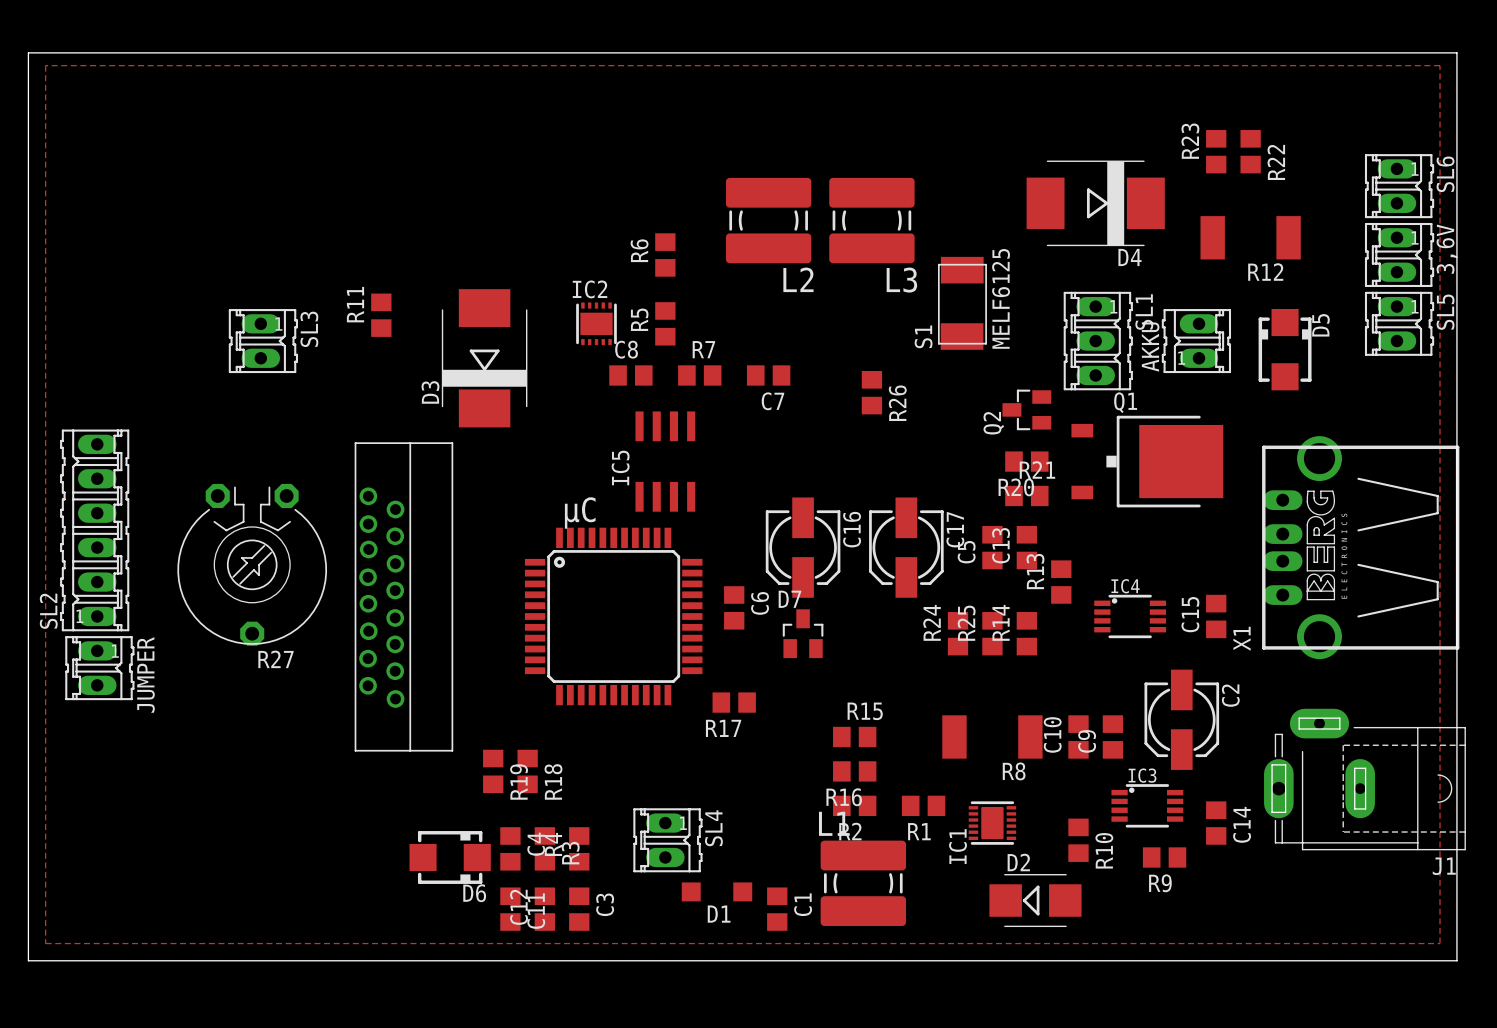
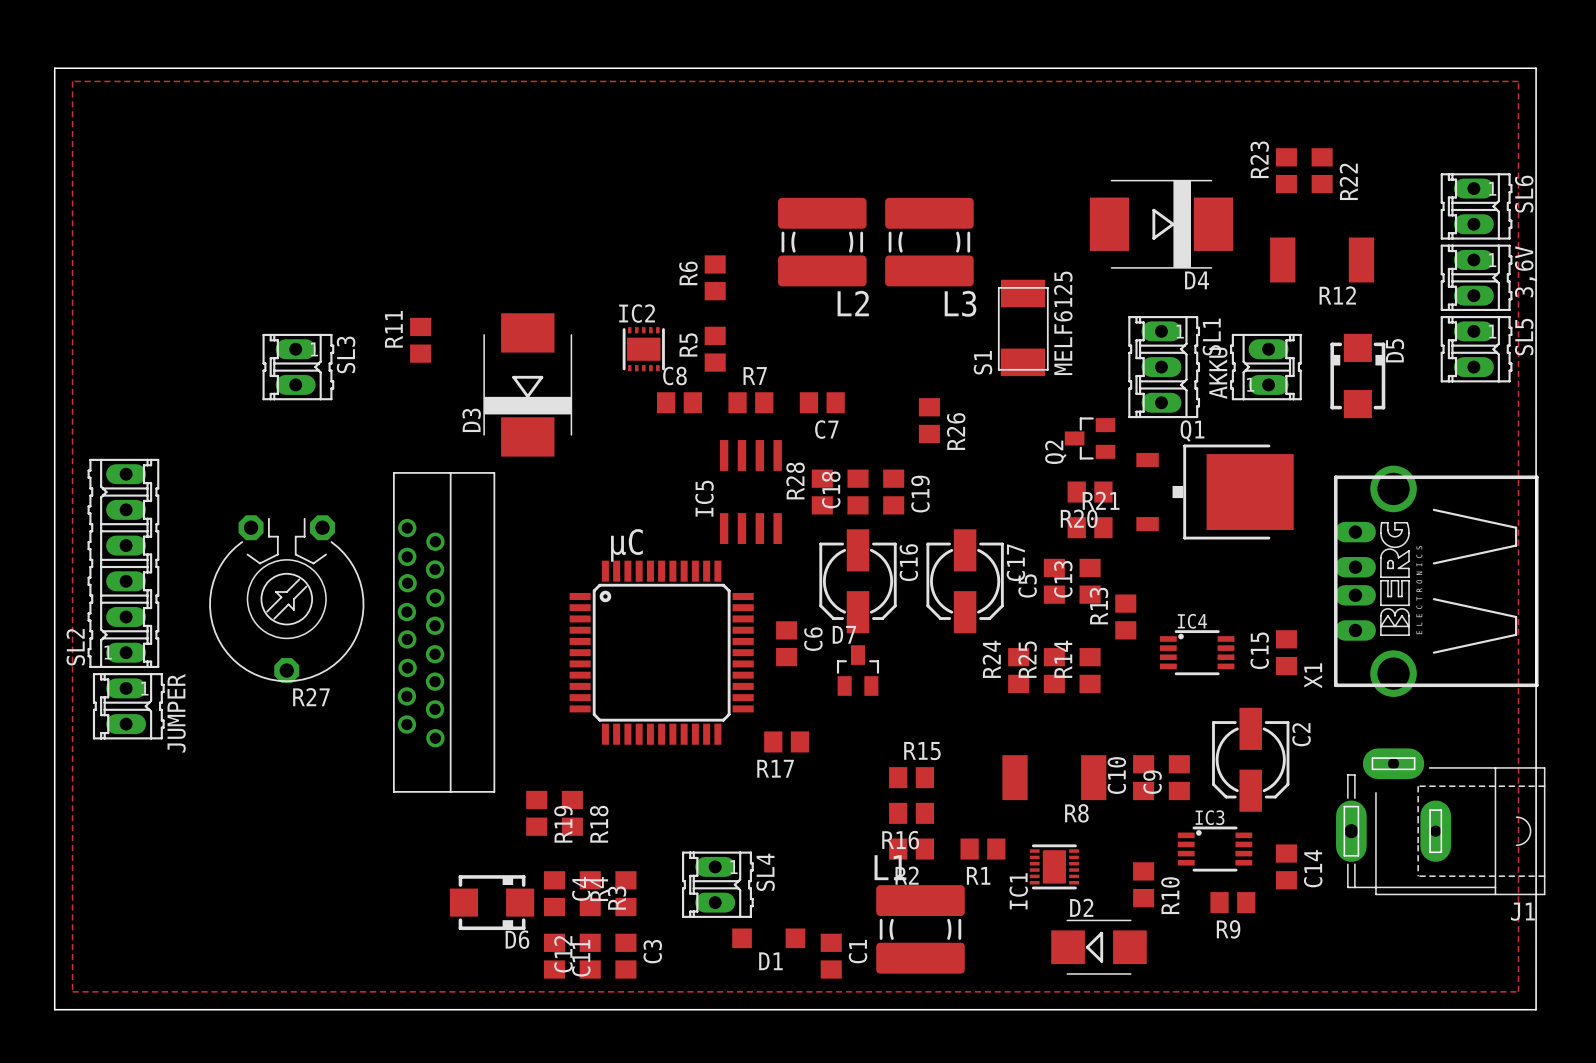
IC5 position: (665, 461) -> (750, 492)
R28: none -> (822, 492)
C18: none -> (858, 492)
C19: none -> (893, 492)

